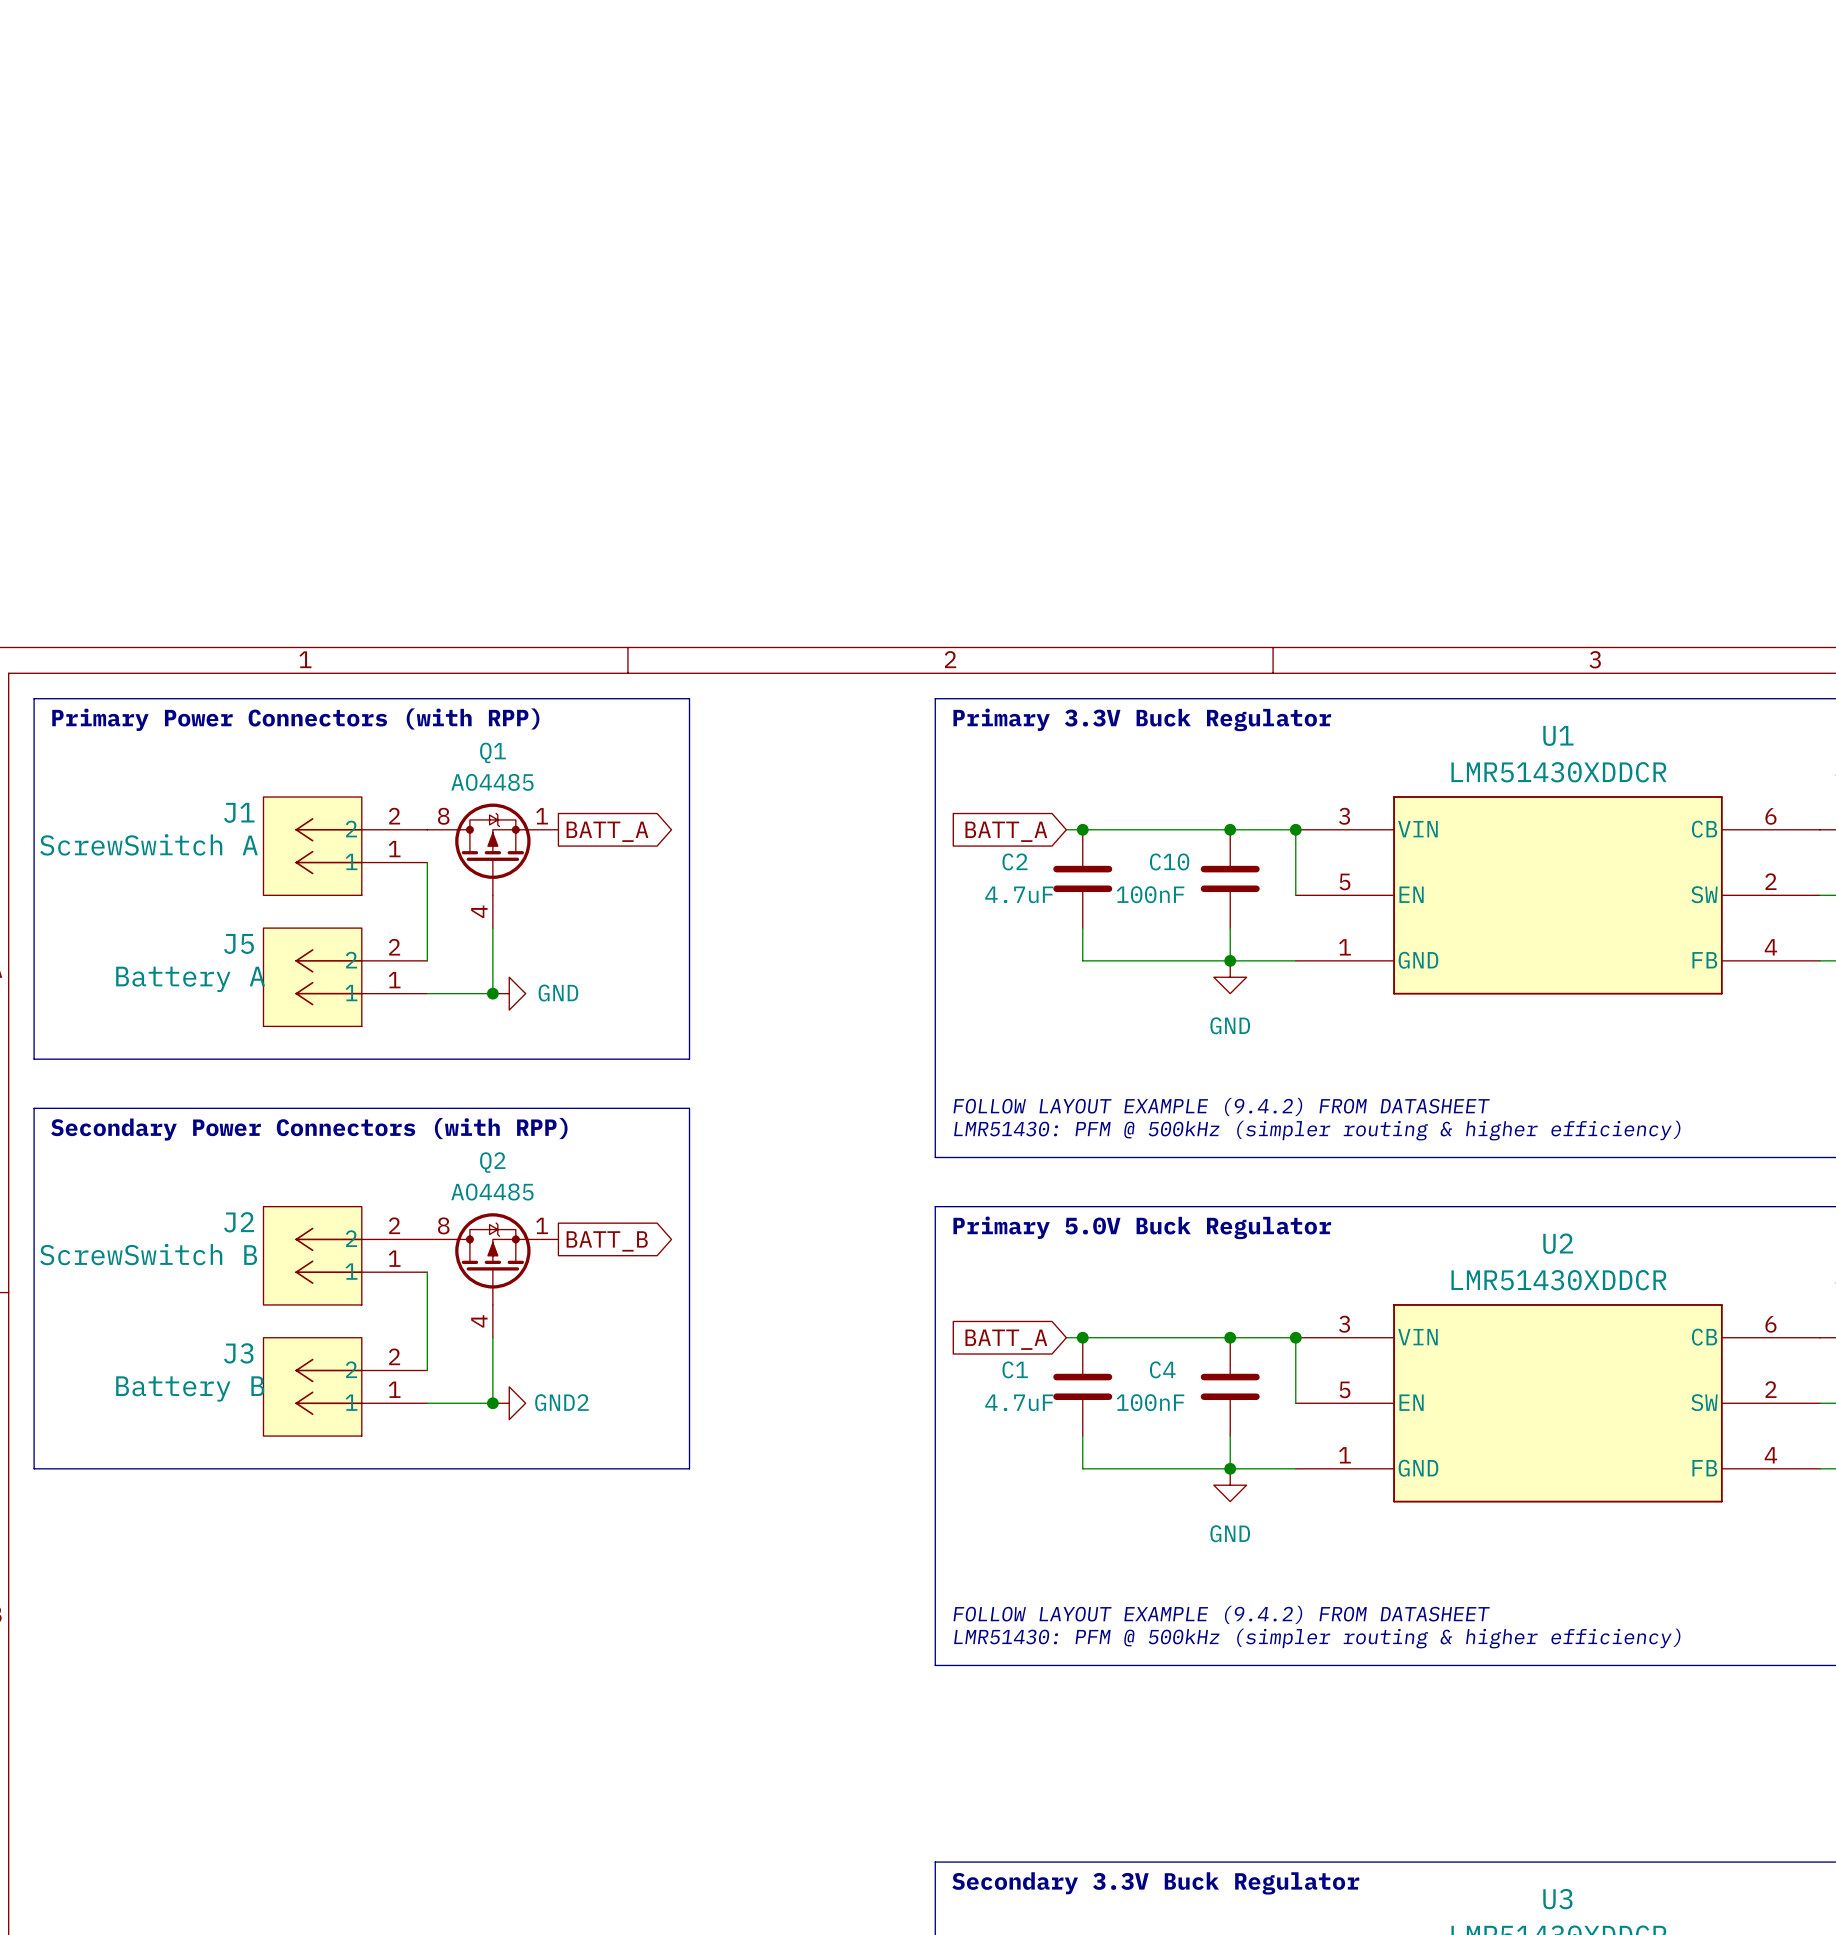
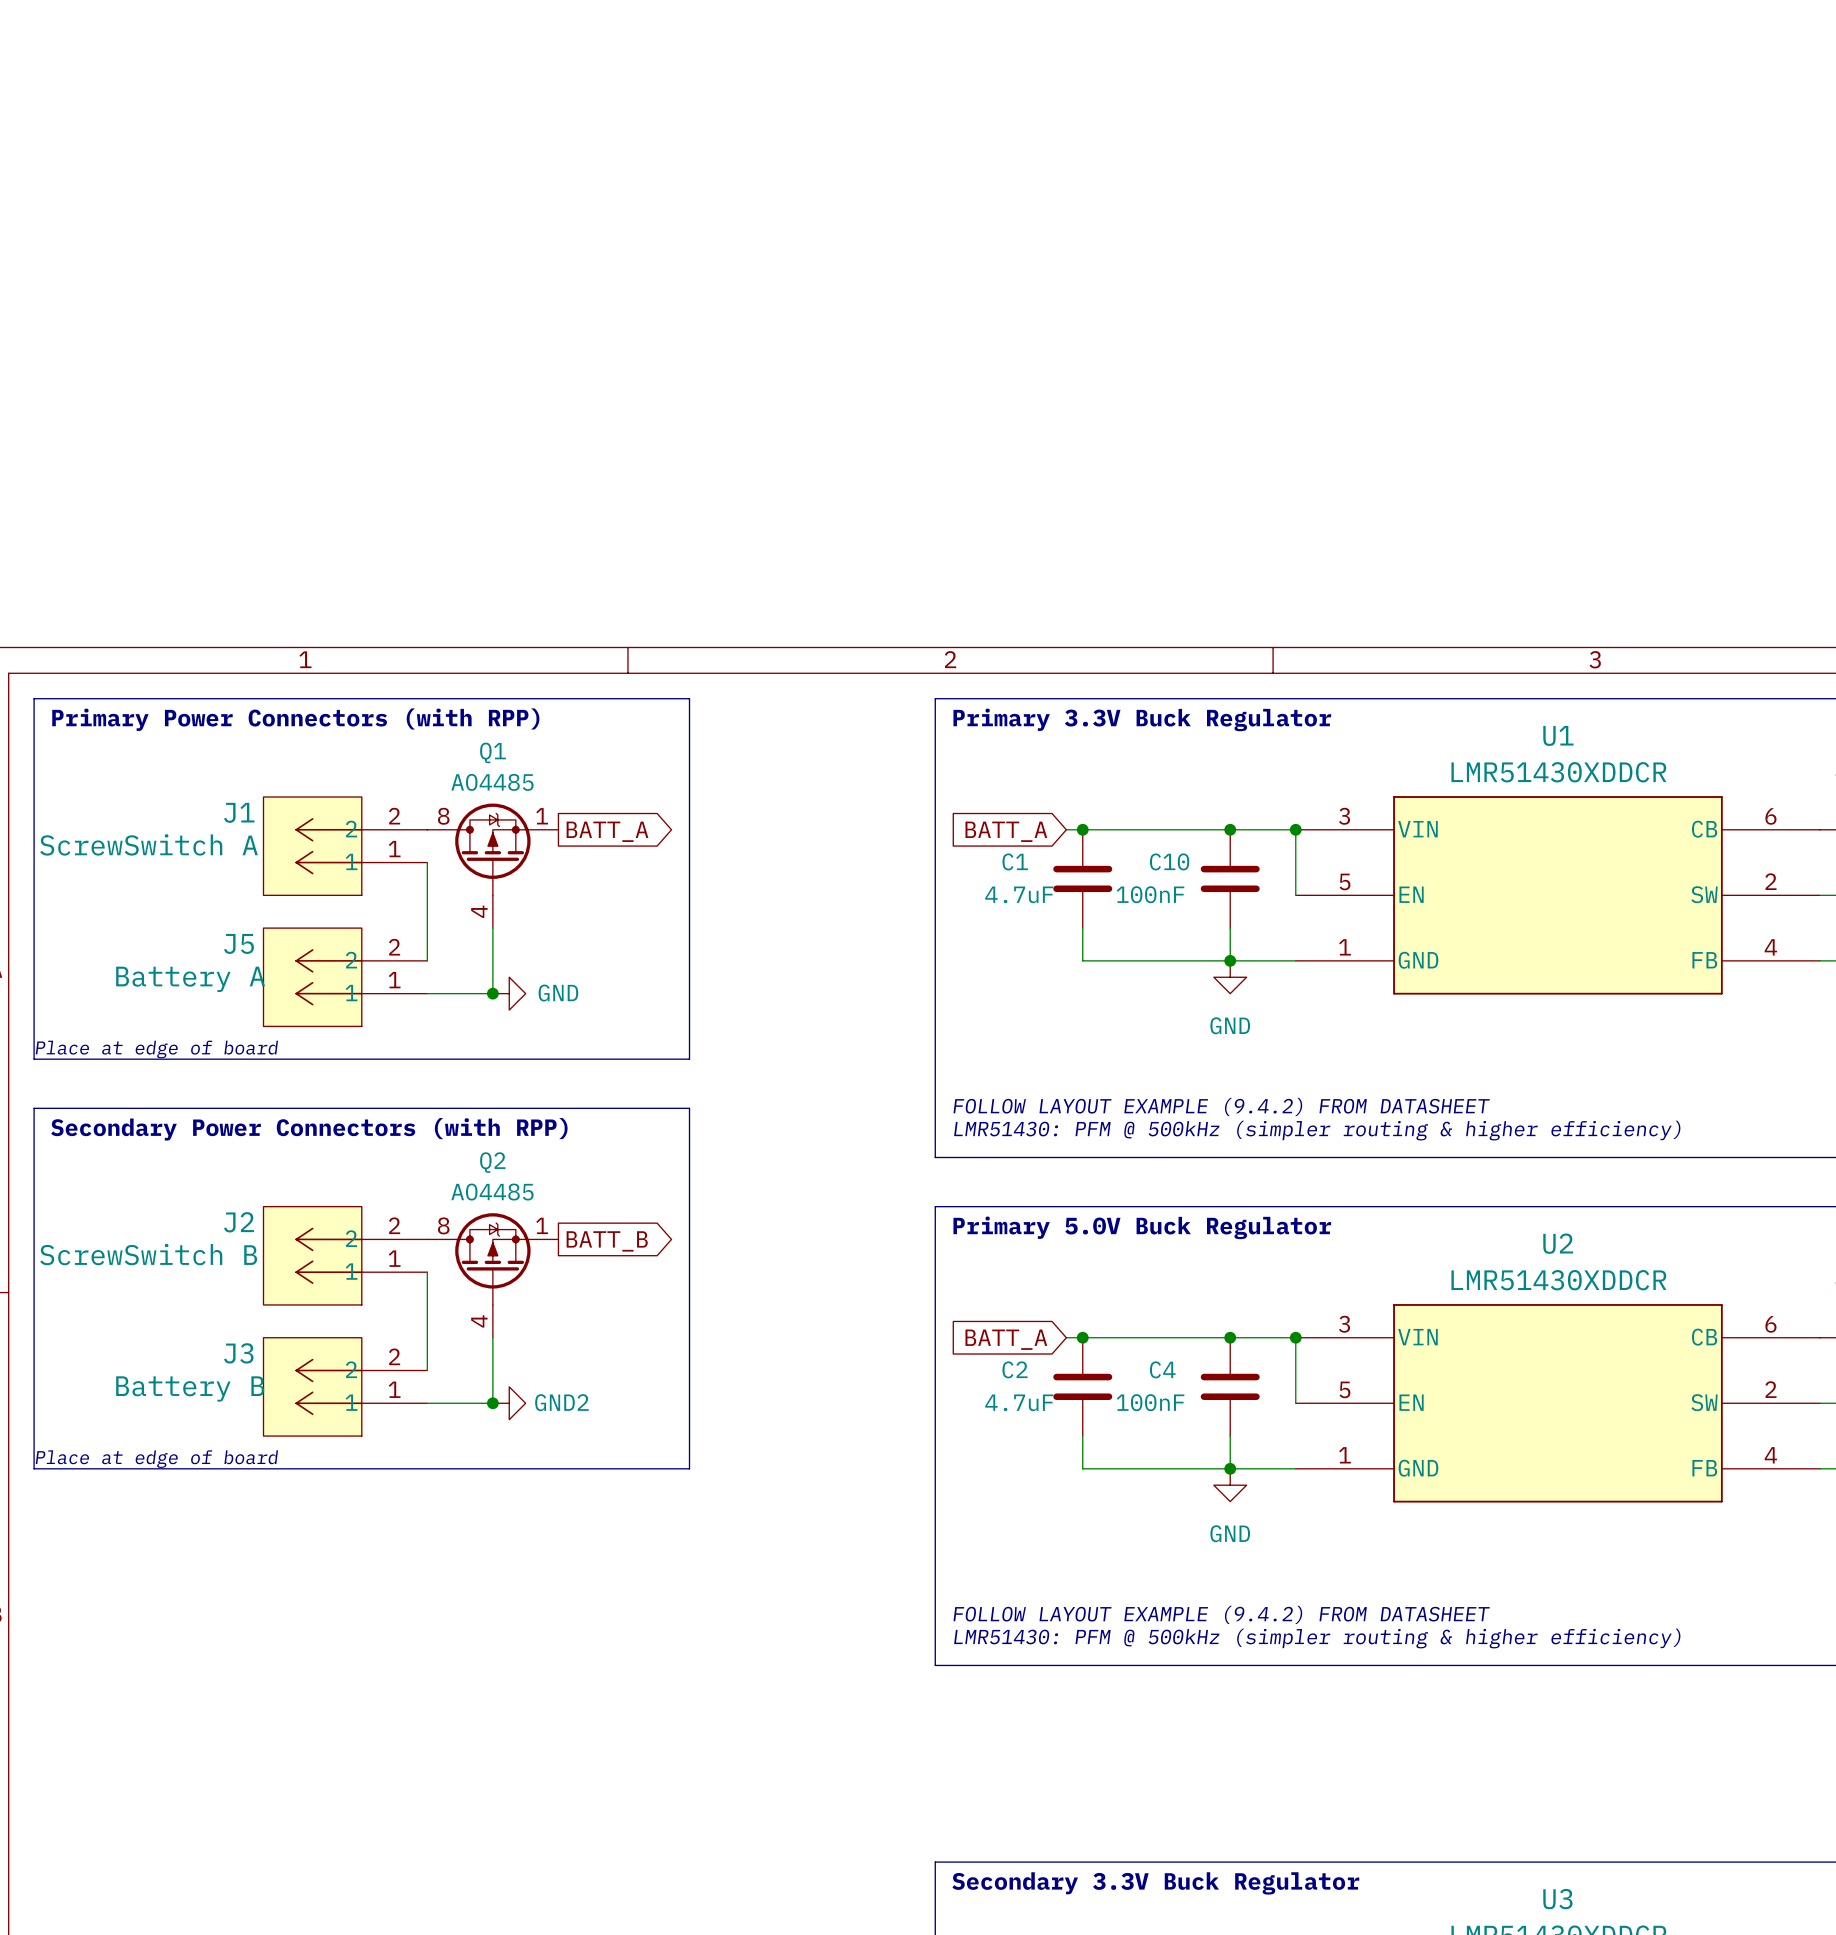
C2 name: C2 (1014, 861) -> C1 (1015, 861)
text: none -> Place at edge of board (156, 1049)
C1 name: C1 (1015, 1369) -> C2 (1014, 1369)
text: none -> Place at edge of board (156, 1459)

